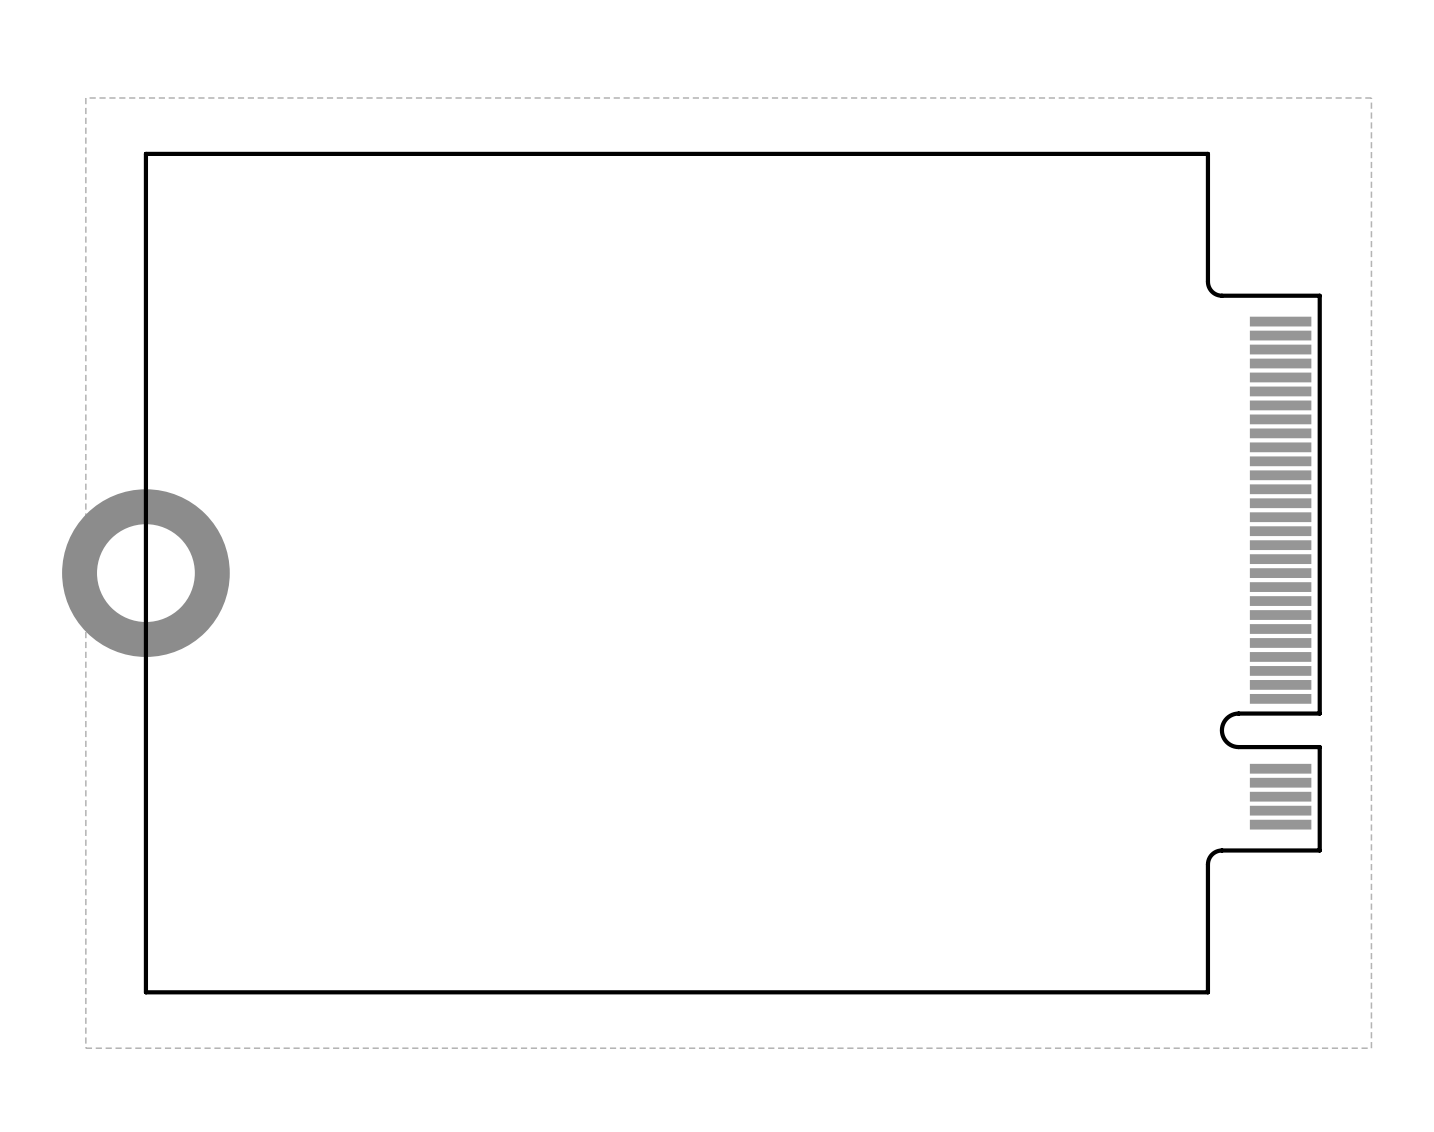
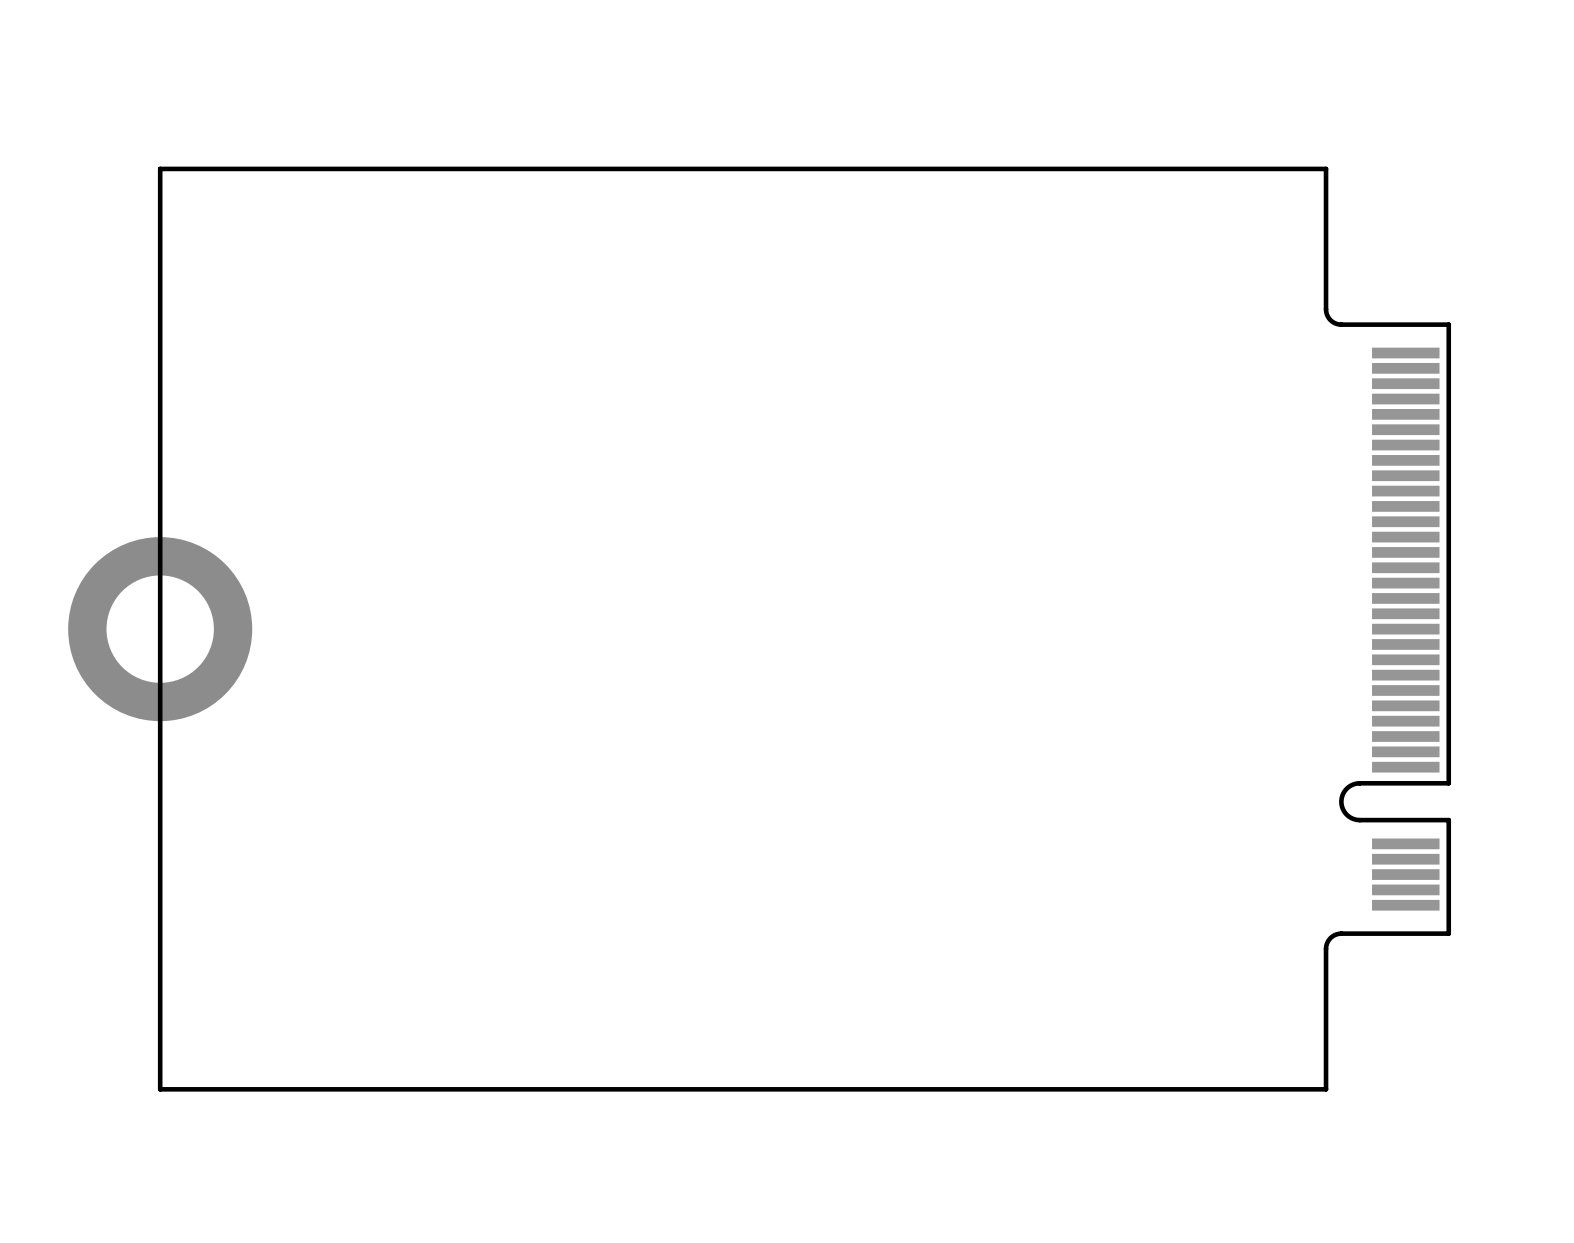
zone outline: (1371, 97) (85, 97) (85, 1048) (1371, 1048) (1371, 97) -> none

